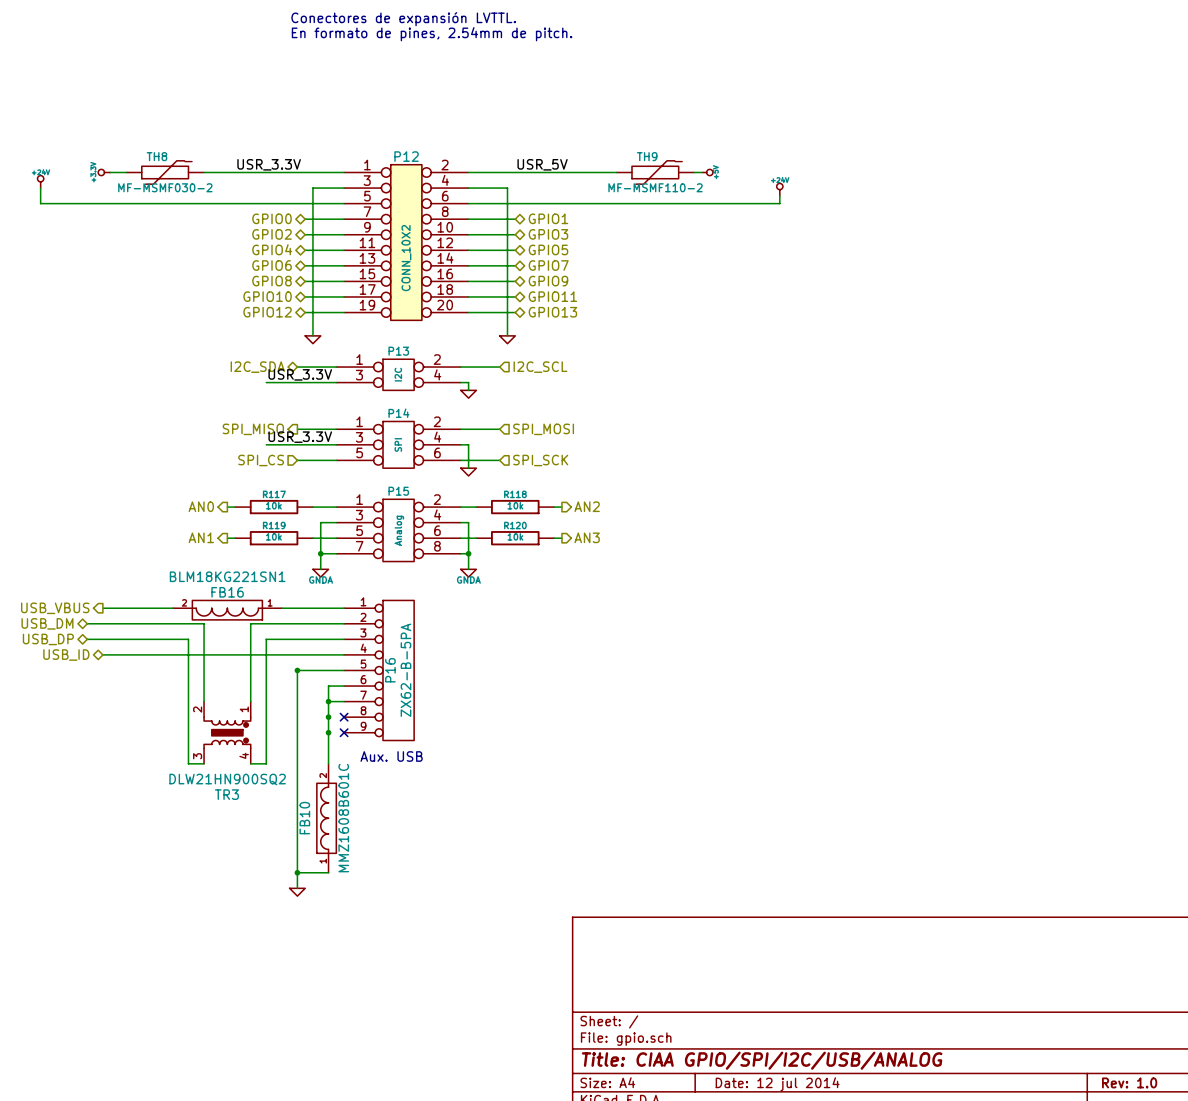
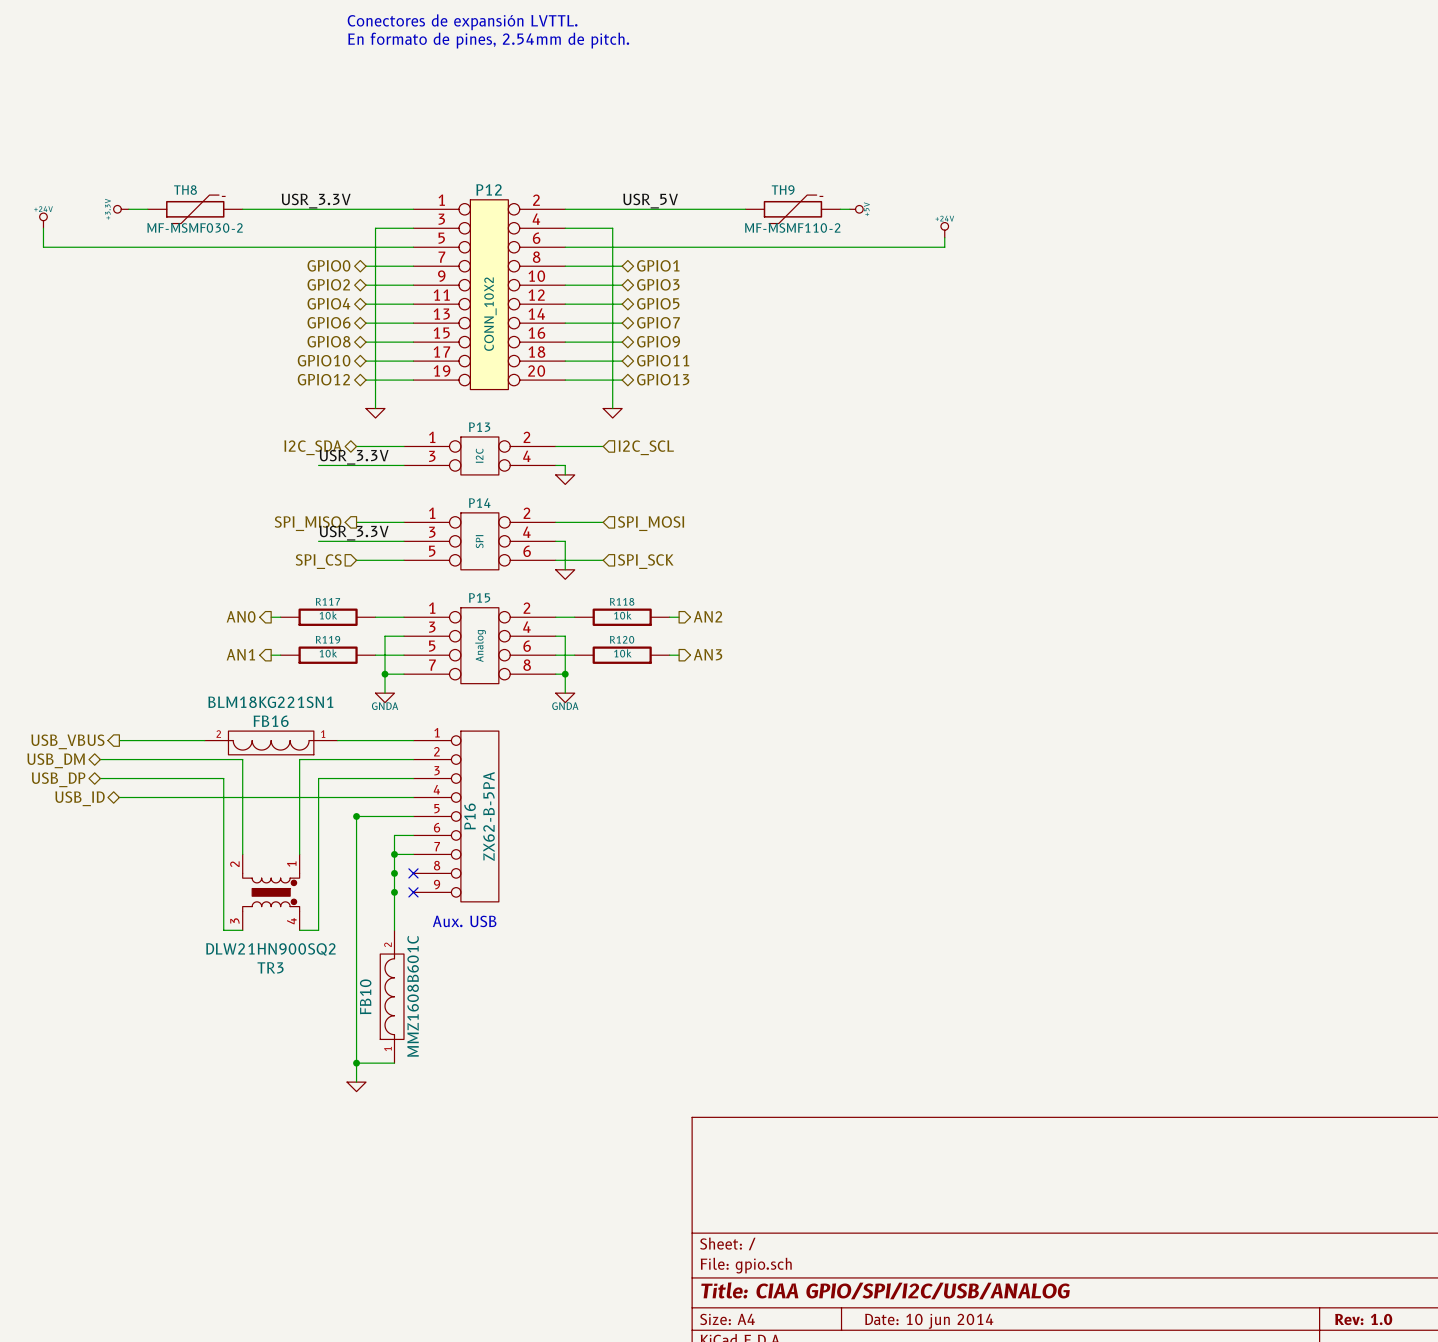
title block: Date: 12 jul 2014 (777, 1084) -> Date: 10 jun 2014 (929, 1321)

